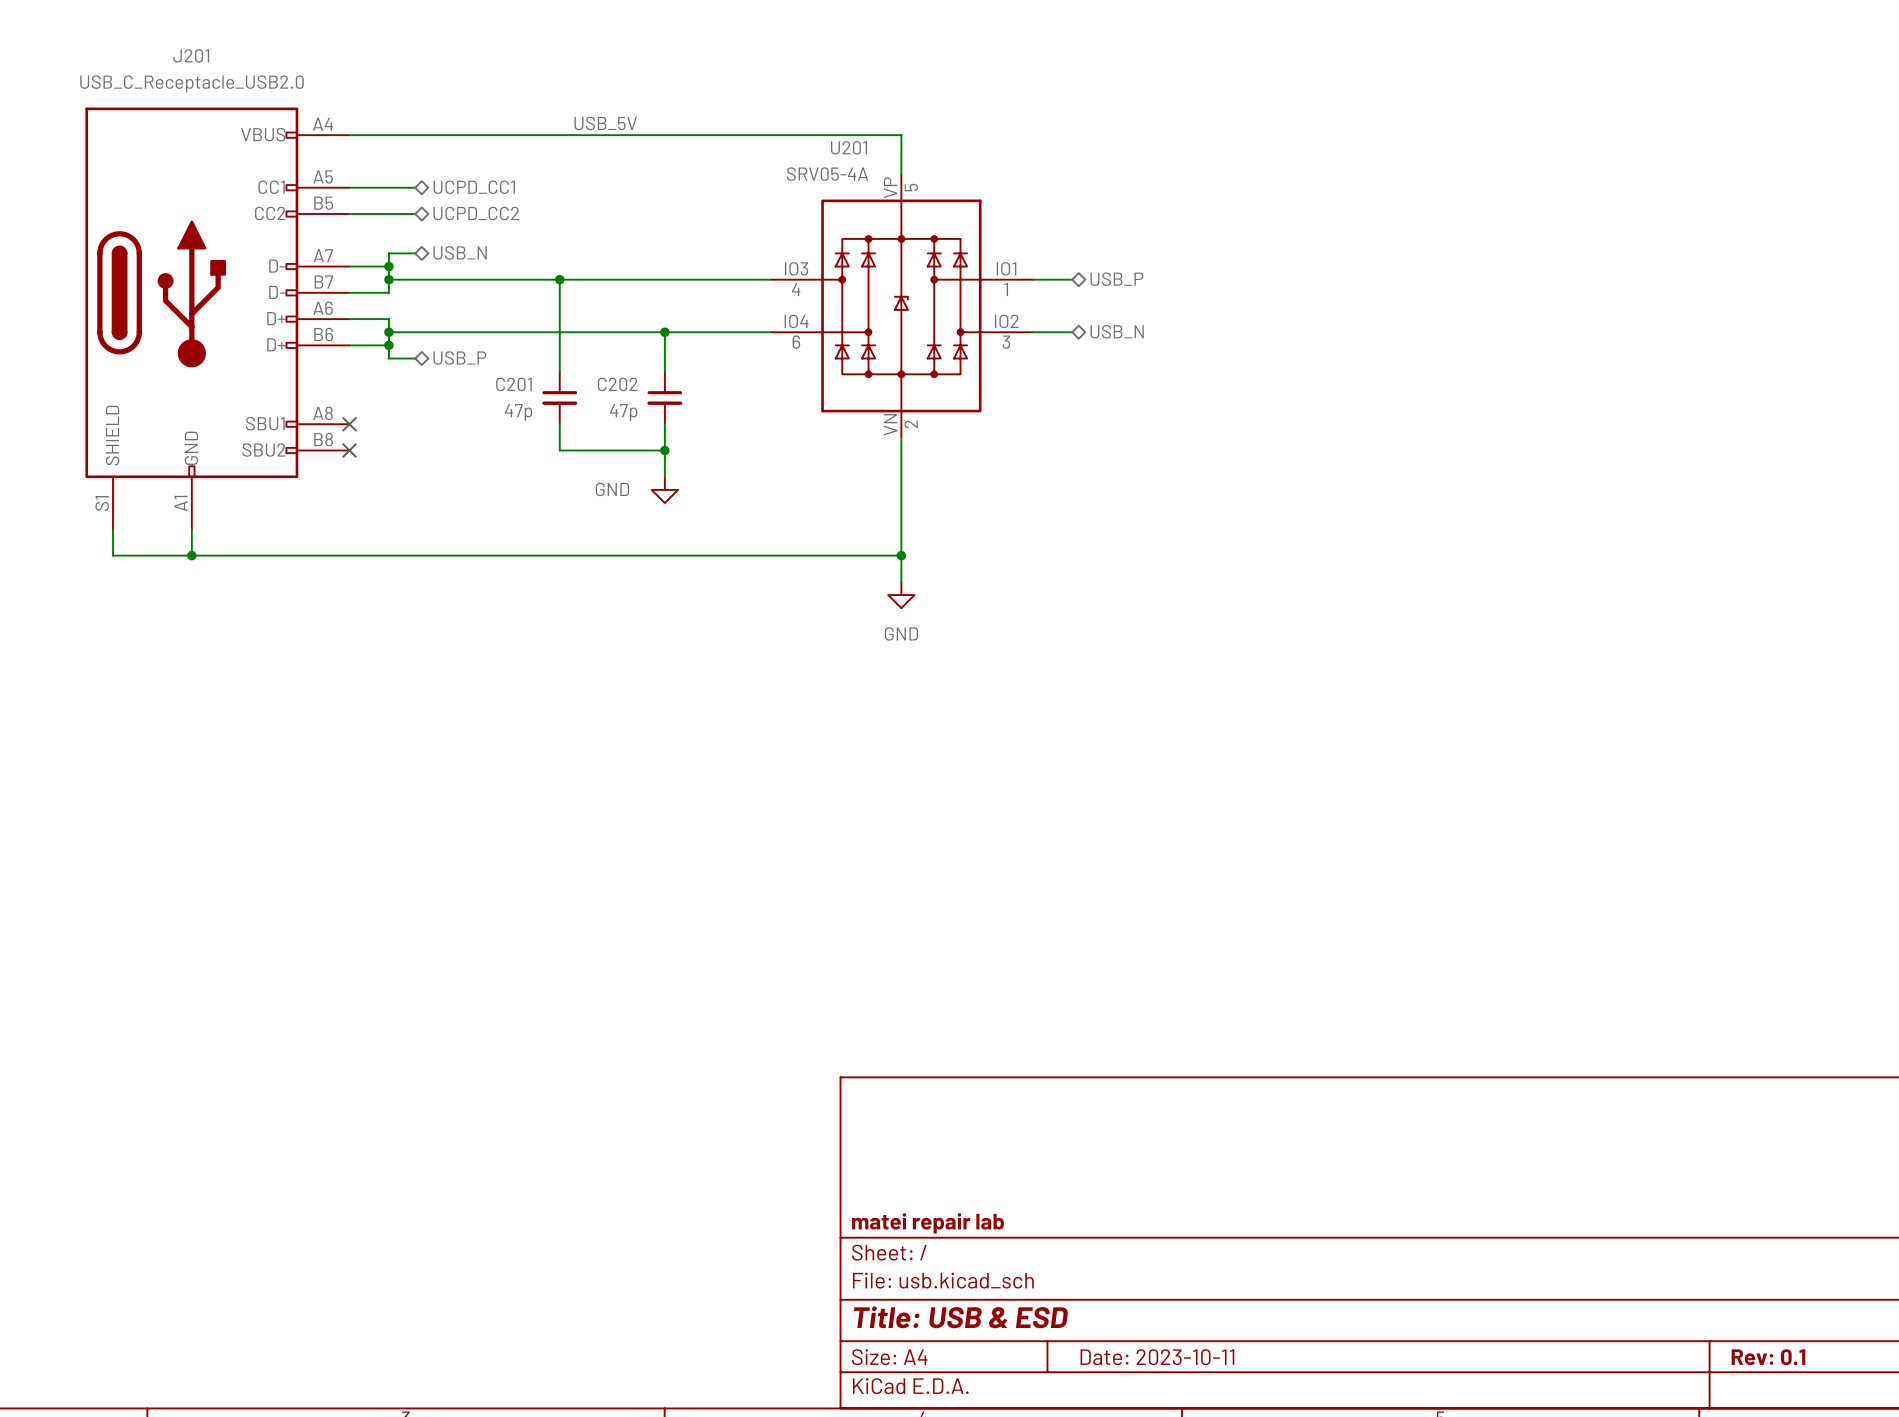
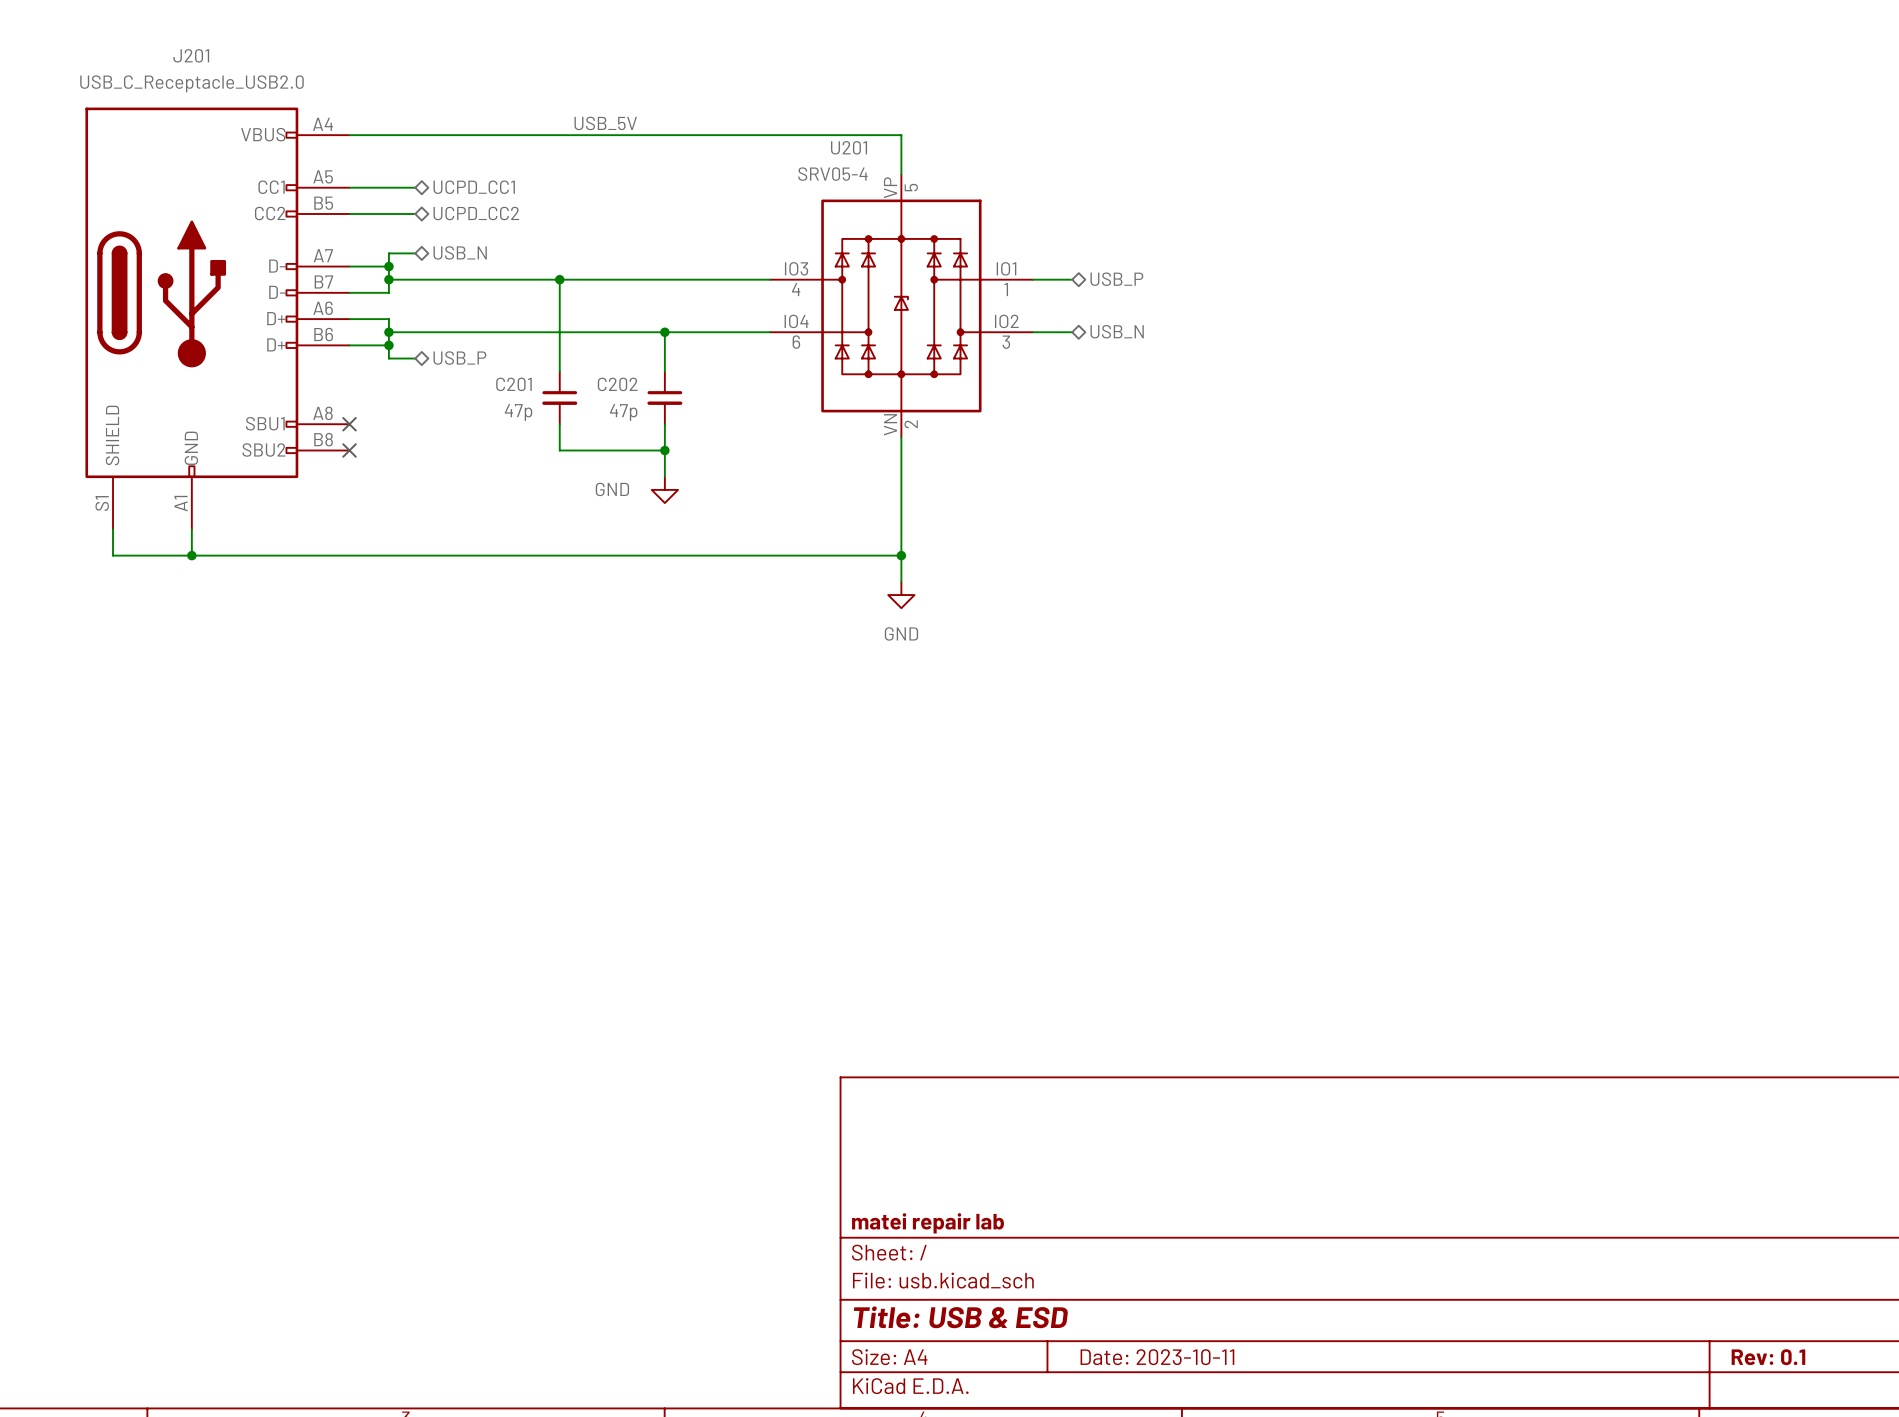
U201 value: SRV05-4A (827, 174) -> SRV05-4 (832, 174)

